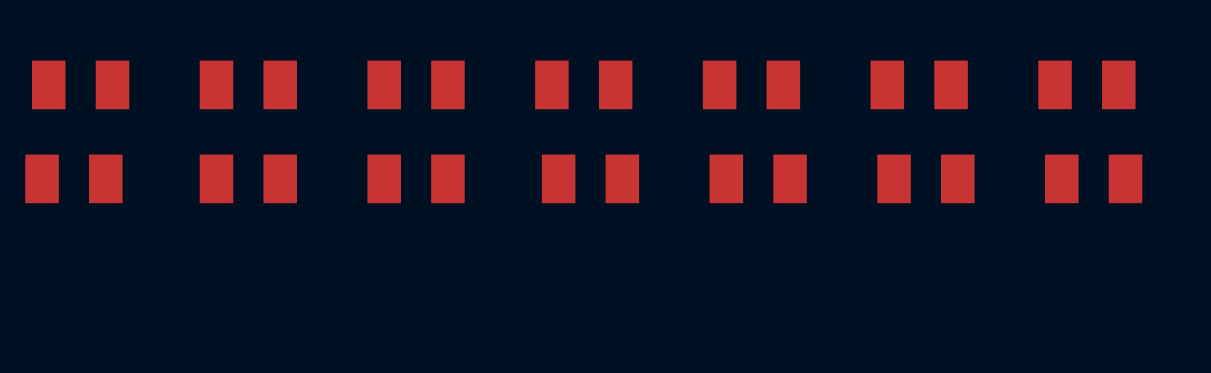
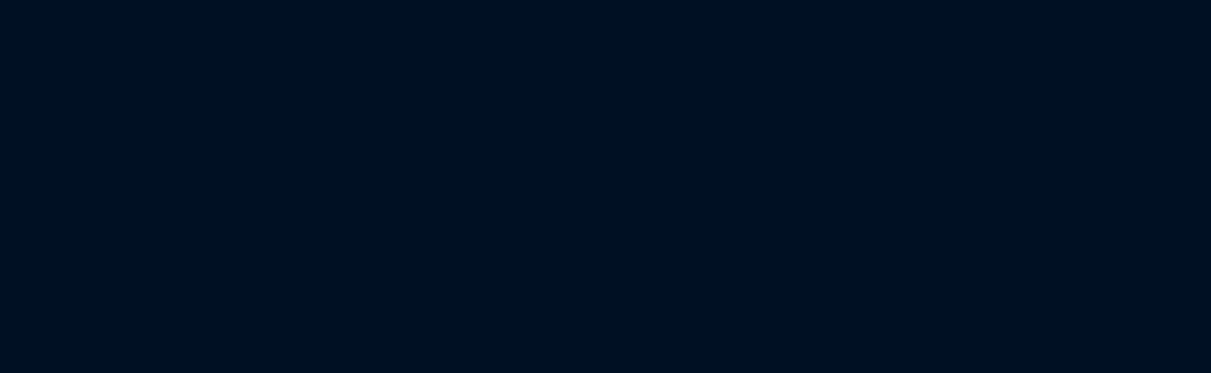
part: (80, 84) -> none
part: (248, 84) -> none
part: (416, 84) -> none
part: (583, 84) -> none
part: (751, 84) -> none
part: (919, 84) -> none
part: (1086, 84) -> none
part: (73, 178) -> none
part: (248, 178) -> none
part: (416, 178) -> none
part: (590, 178) -> none
part: (758, 178) -> none
part: (925, 178) -> none
part: (1093, 178) -> none

